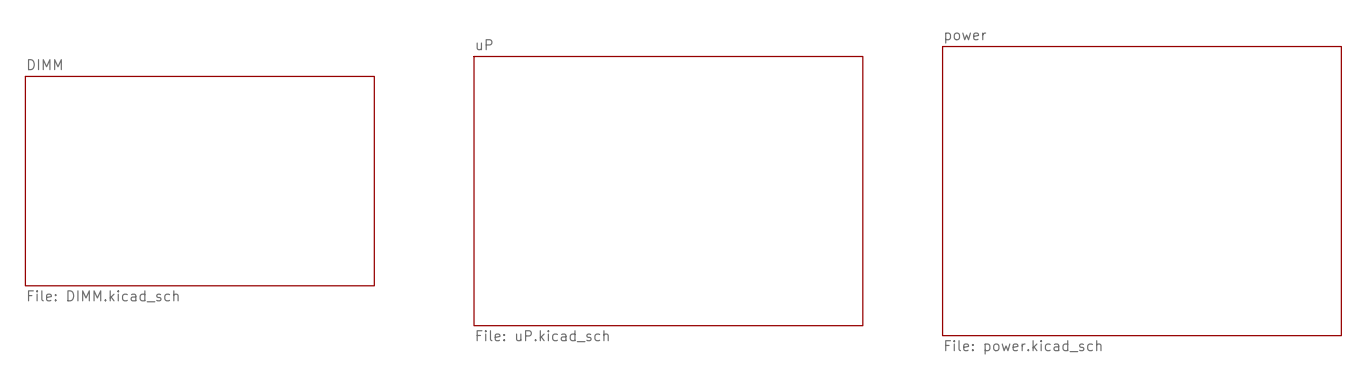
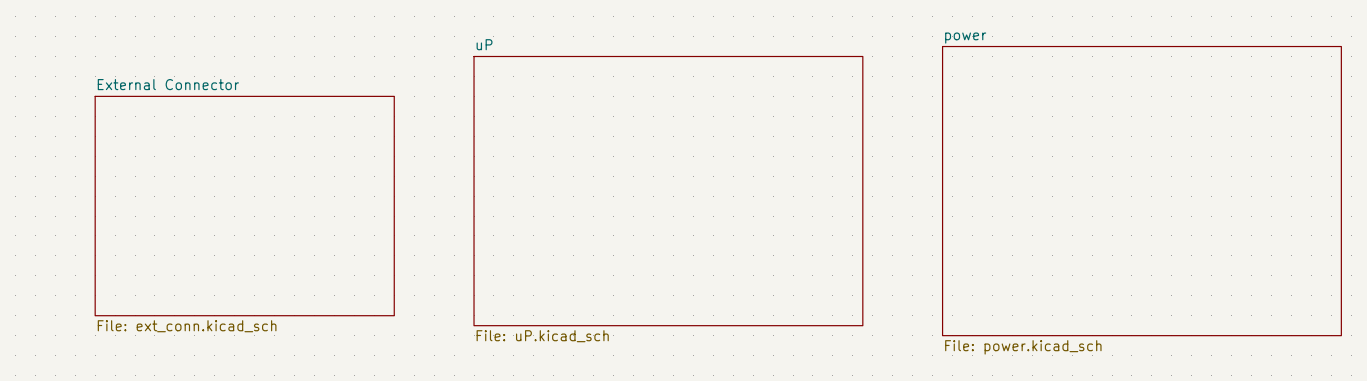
sheet DIMM: File: DIMM.kicad_sch (199, 181) -> none
sheet External Connector: none -> File: ext_conn.kicad_sch (244, 206)

